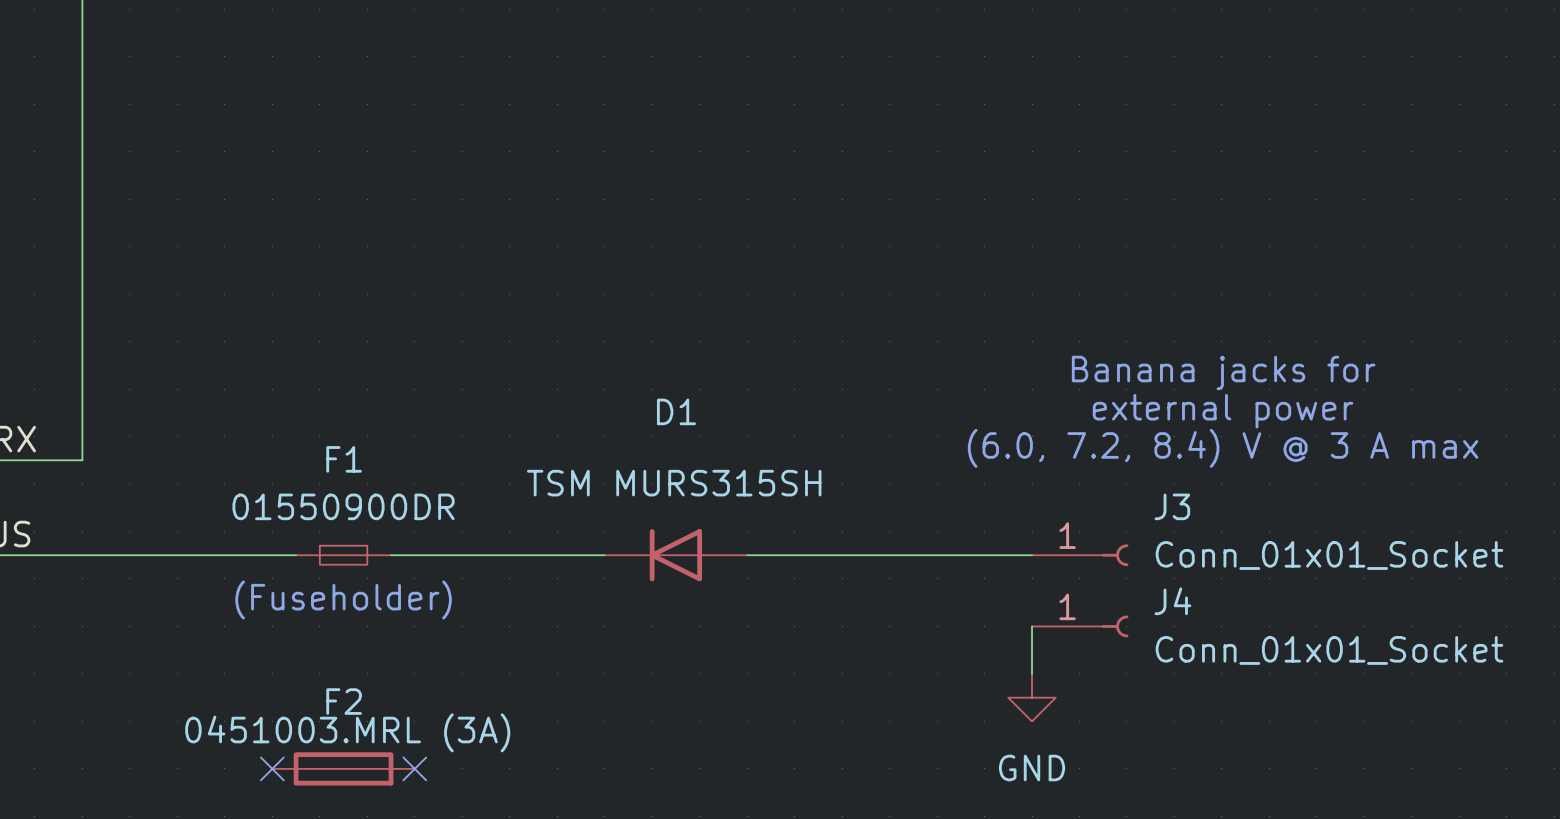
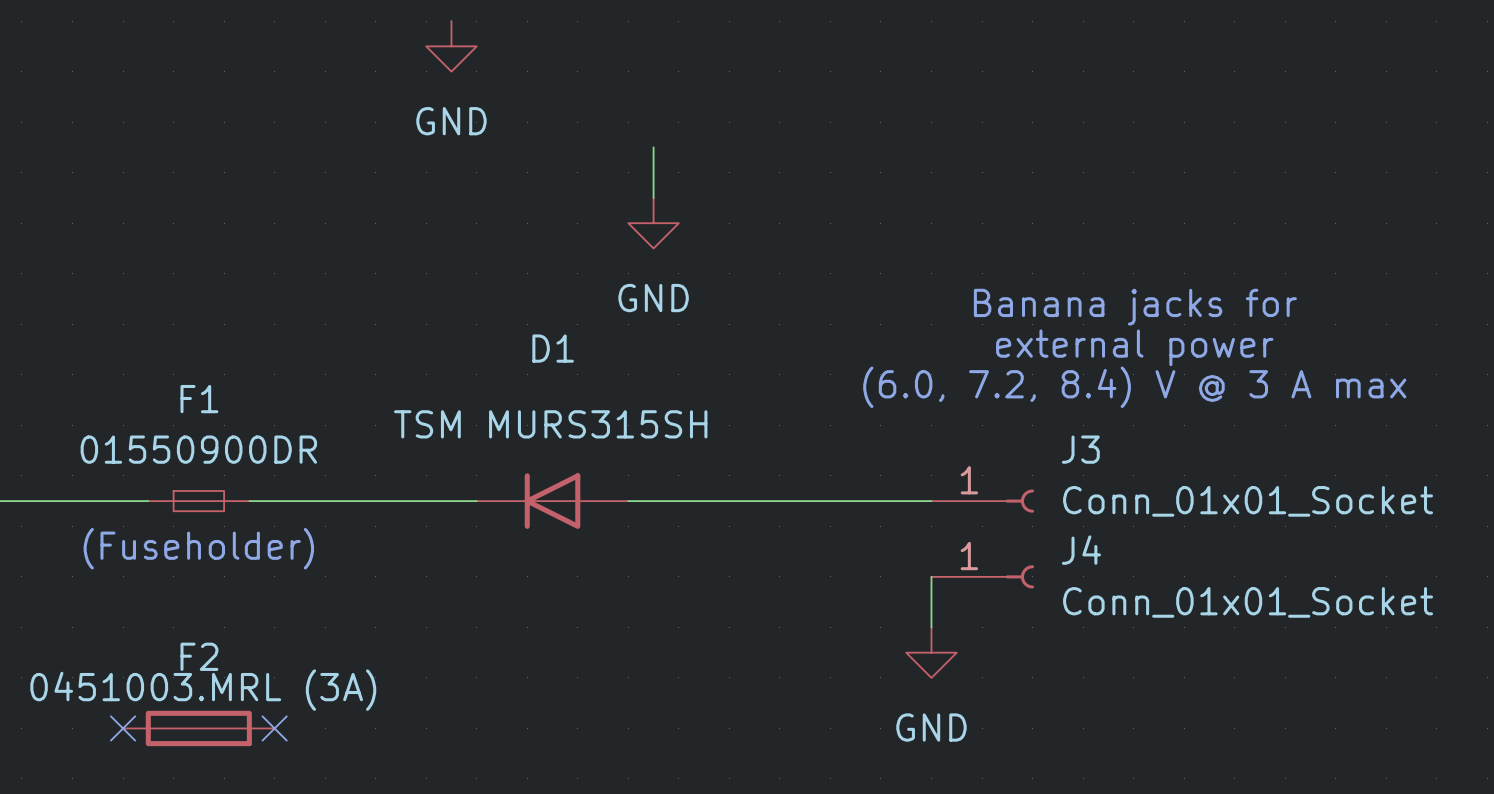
power symbol: none -> GND (451, 46)
wire: none -> (653, 147) (653, 197)
power symbol: none -> GND (653, 223)

